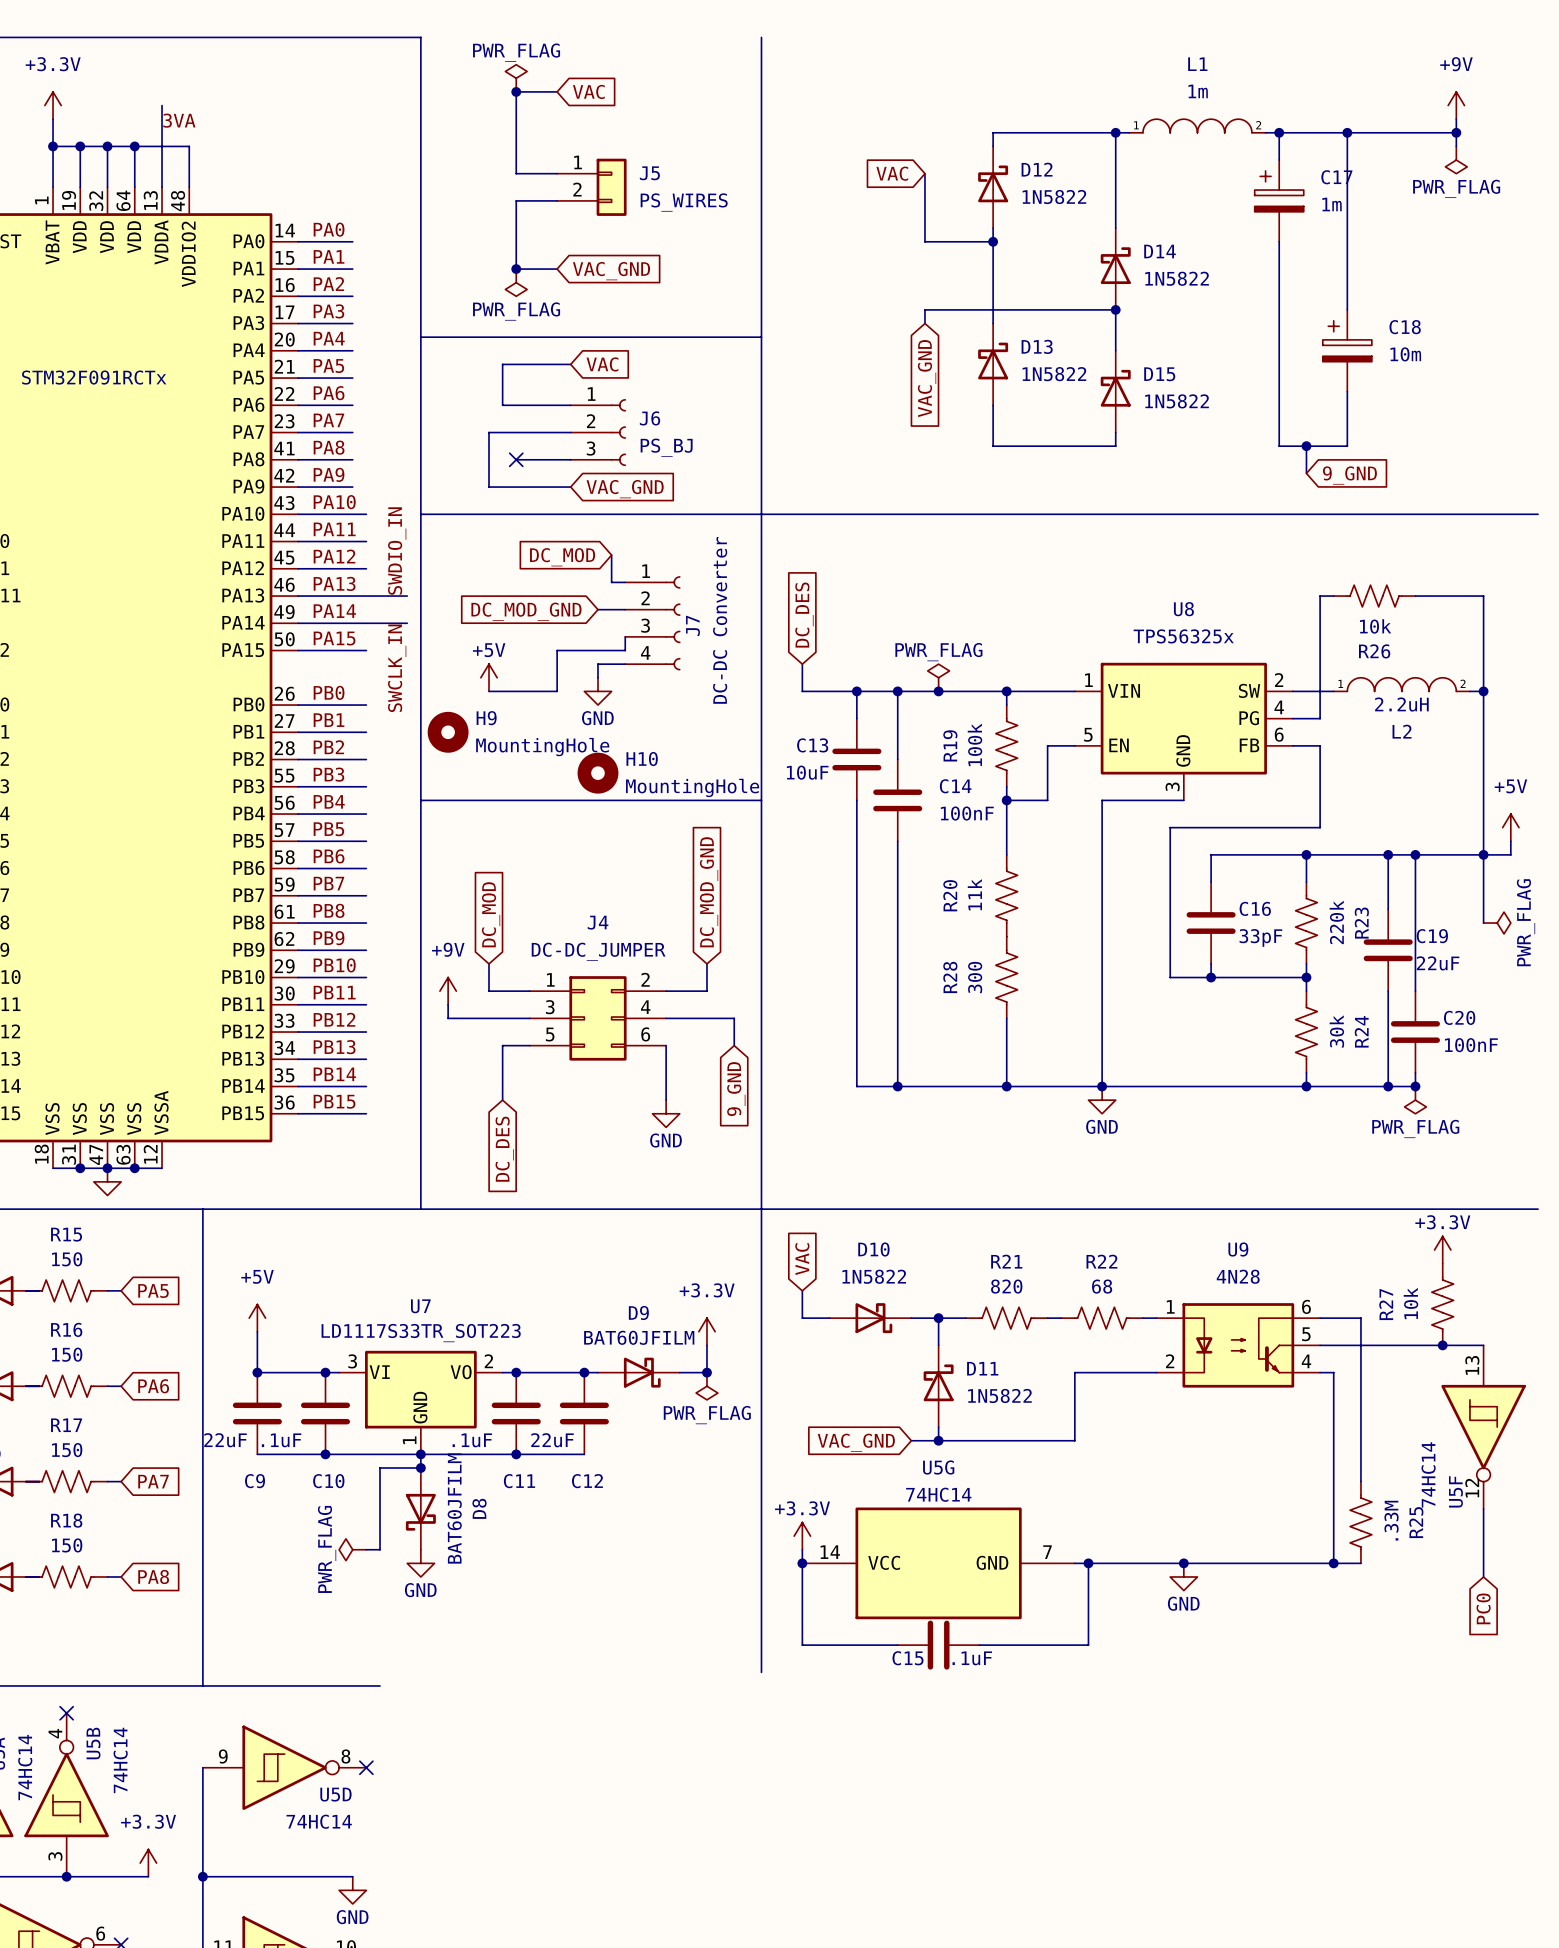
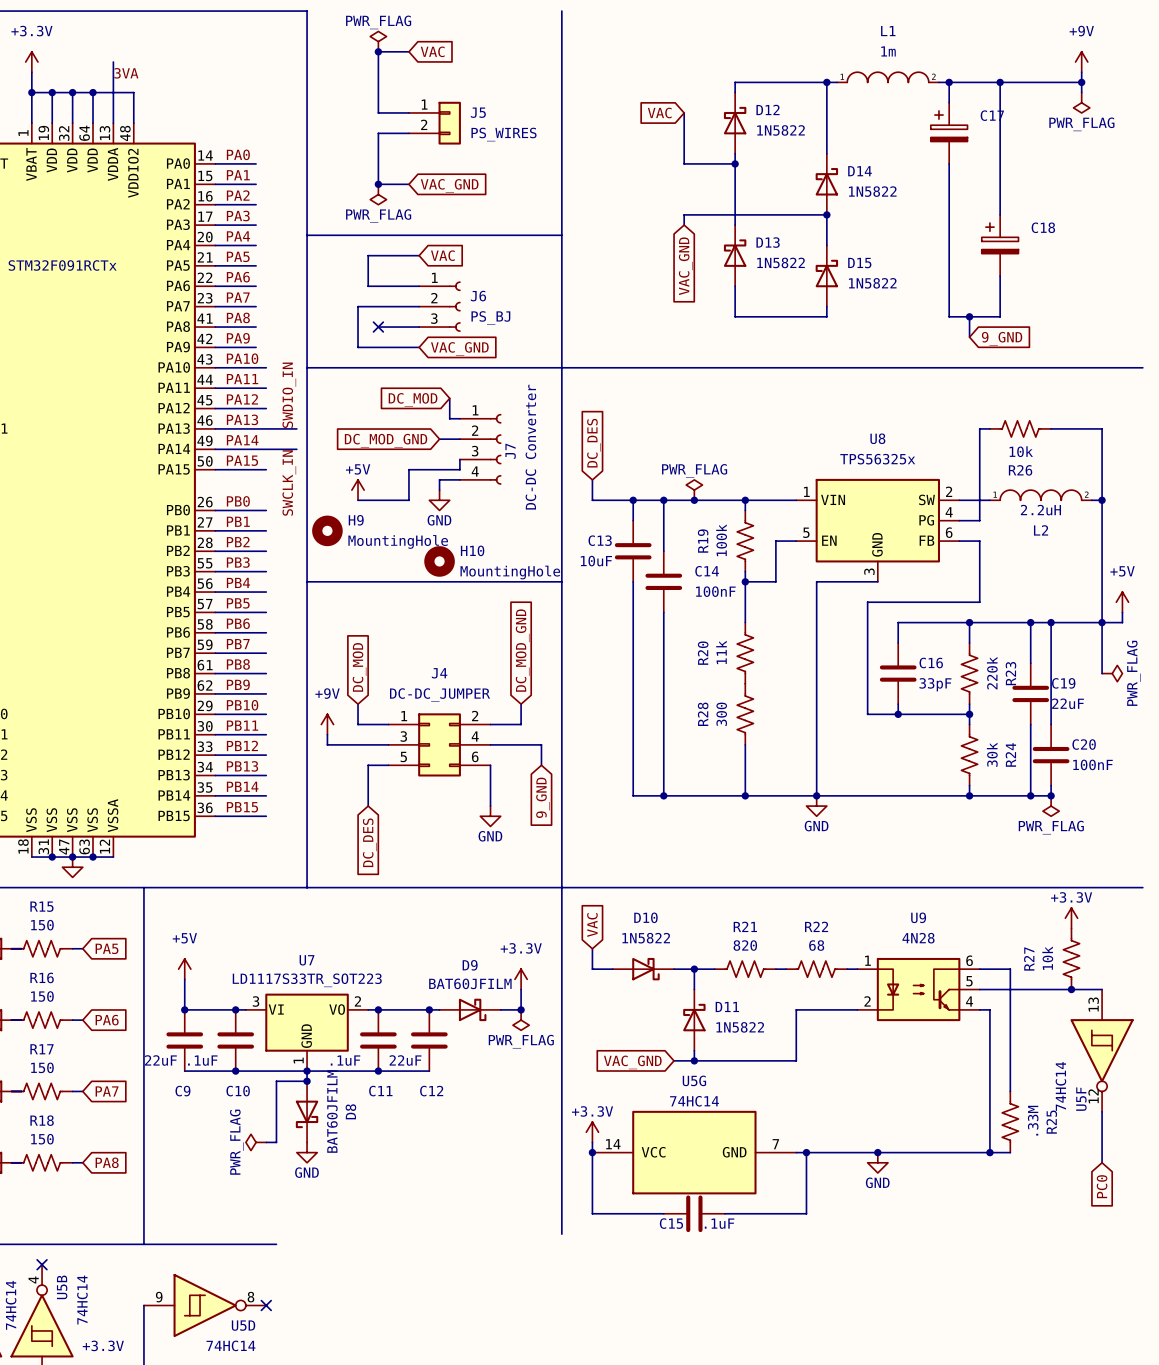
C17 value: 1m (1332, 204) -> none
C18 value: 10m (1405, 354) -> none

